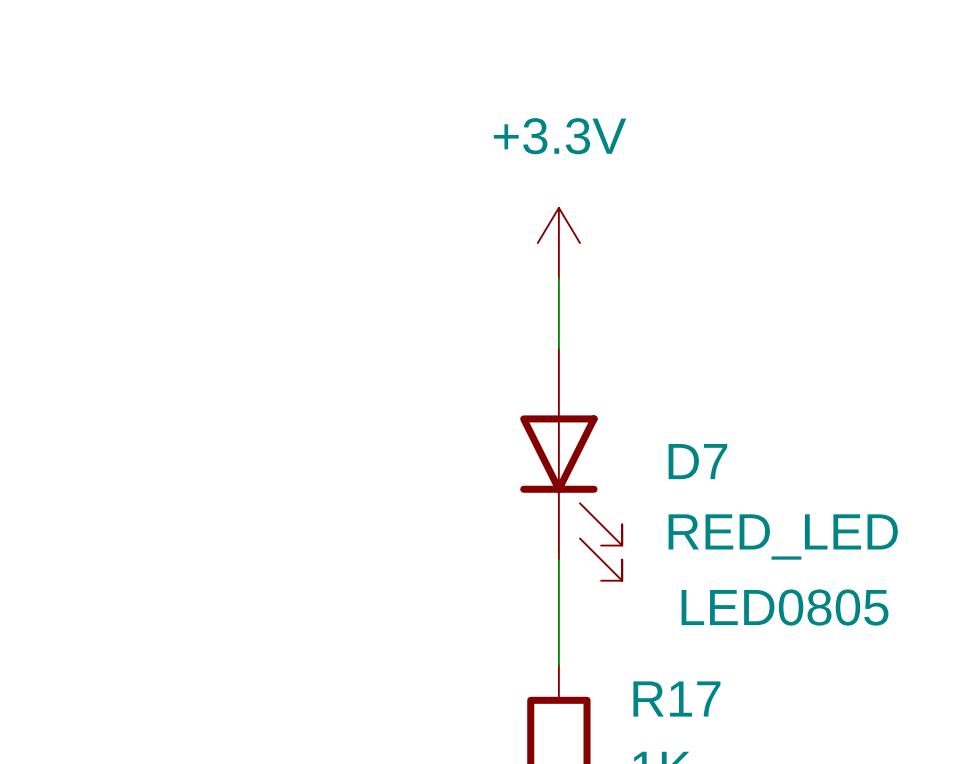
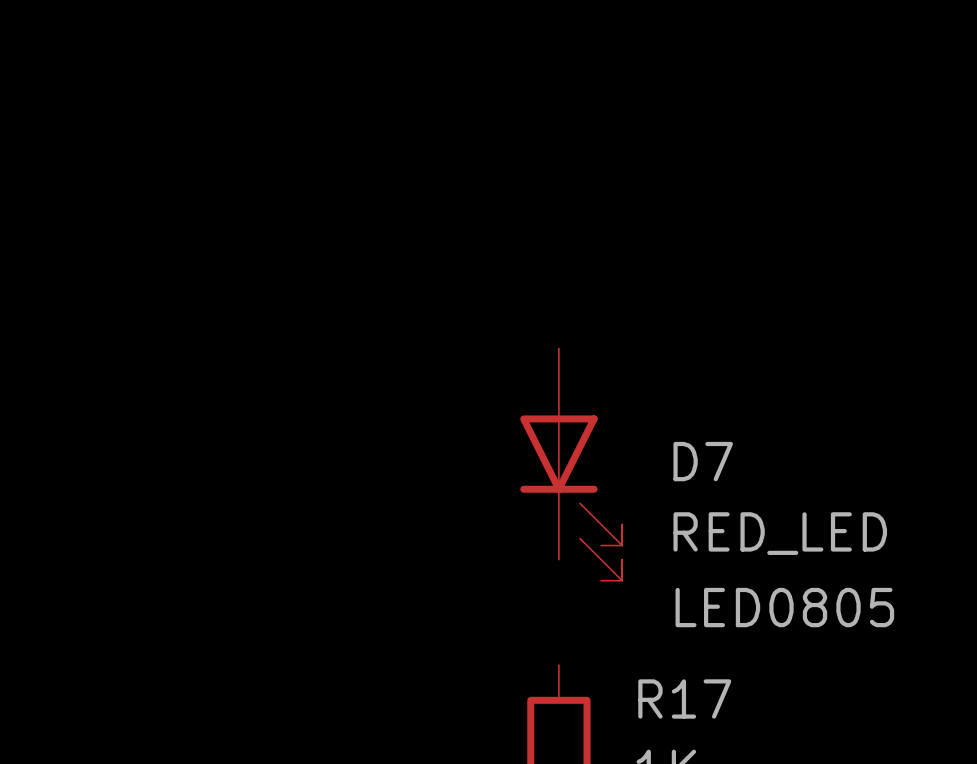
power symbol: +3.3V (558, 243) -> none
wire: (558, 278) (558, 348) -> none
wire: (558, 559) (558, 665) -> none

